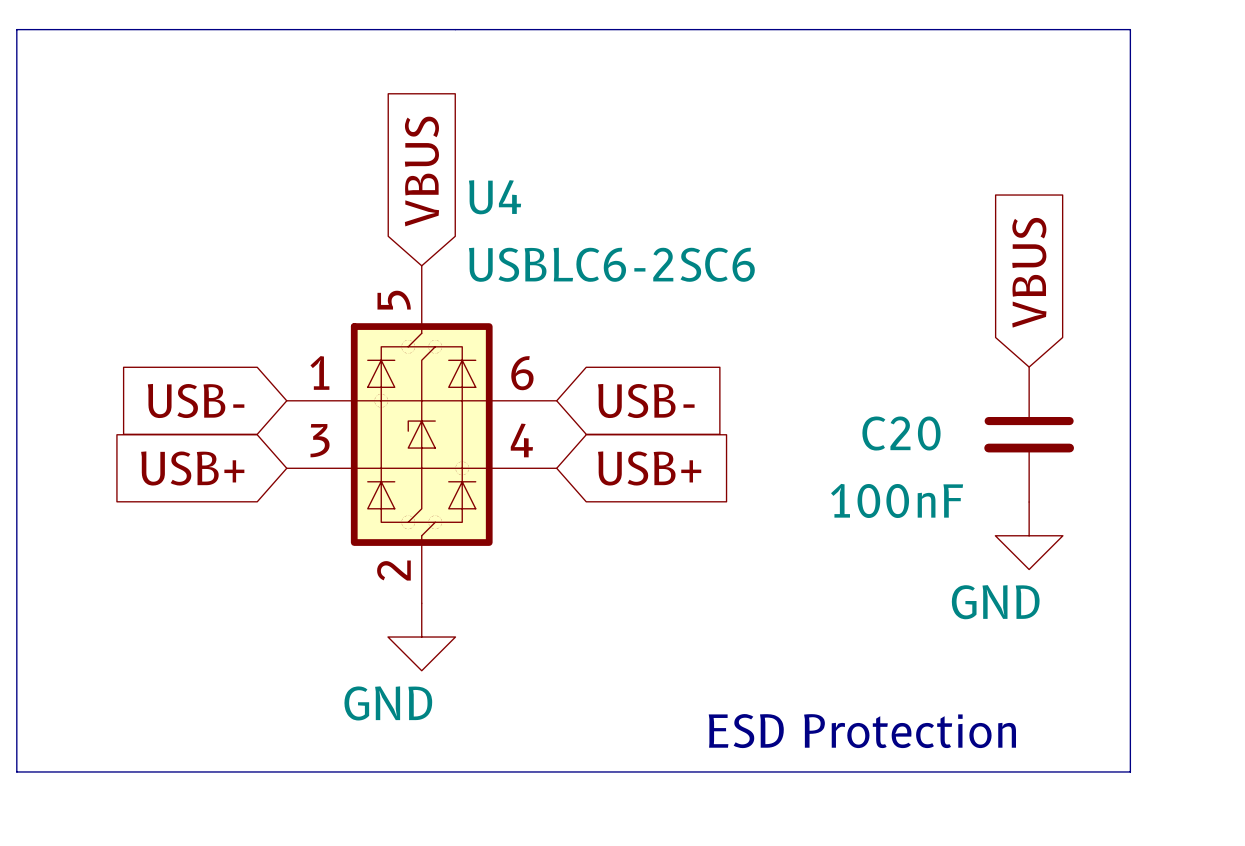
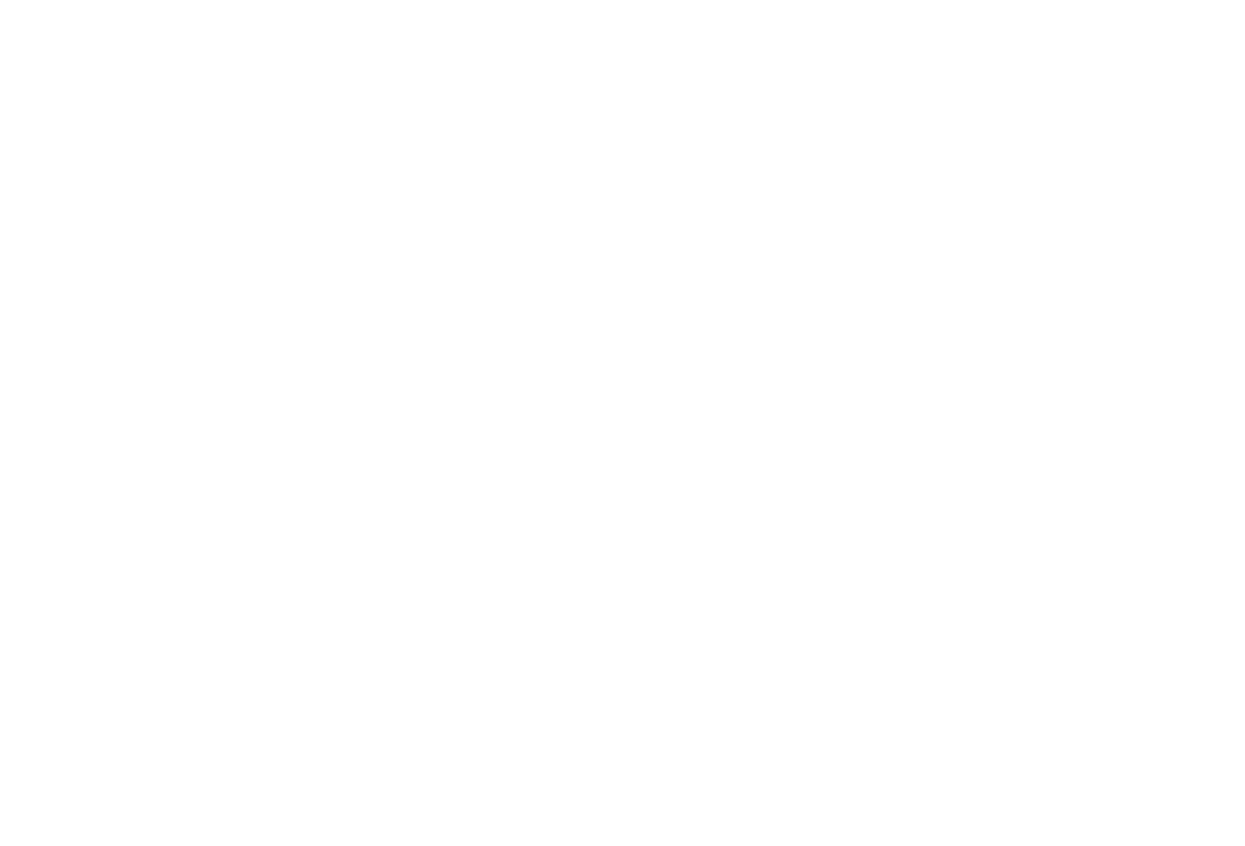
line: (16, 29) (16, 771) (1130, 771) (1130, 29) (16, 29) -> none
global label: VBUS (421, 171) -> none
global label: VBUS (1029, 272) -> none
global label: USB- (196, 400) -> none
global label: USB- (646, 400) -> none
U4: USBLC6-2SC6 (421, 434) -> none
C20: 100nF (1029, 434) -> none
global label: USB+ (192, 468) -> none
global label: USB+ (649, 468) -> none
power symbol: GND (1029, 535) -> none
power symbol: GND (421, 637) -> none
text: ESD Protection (862, 731) -> none

